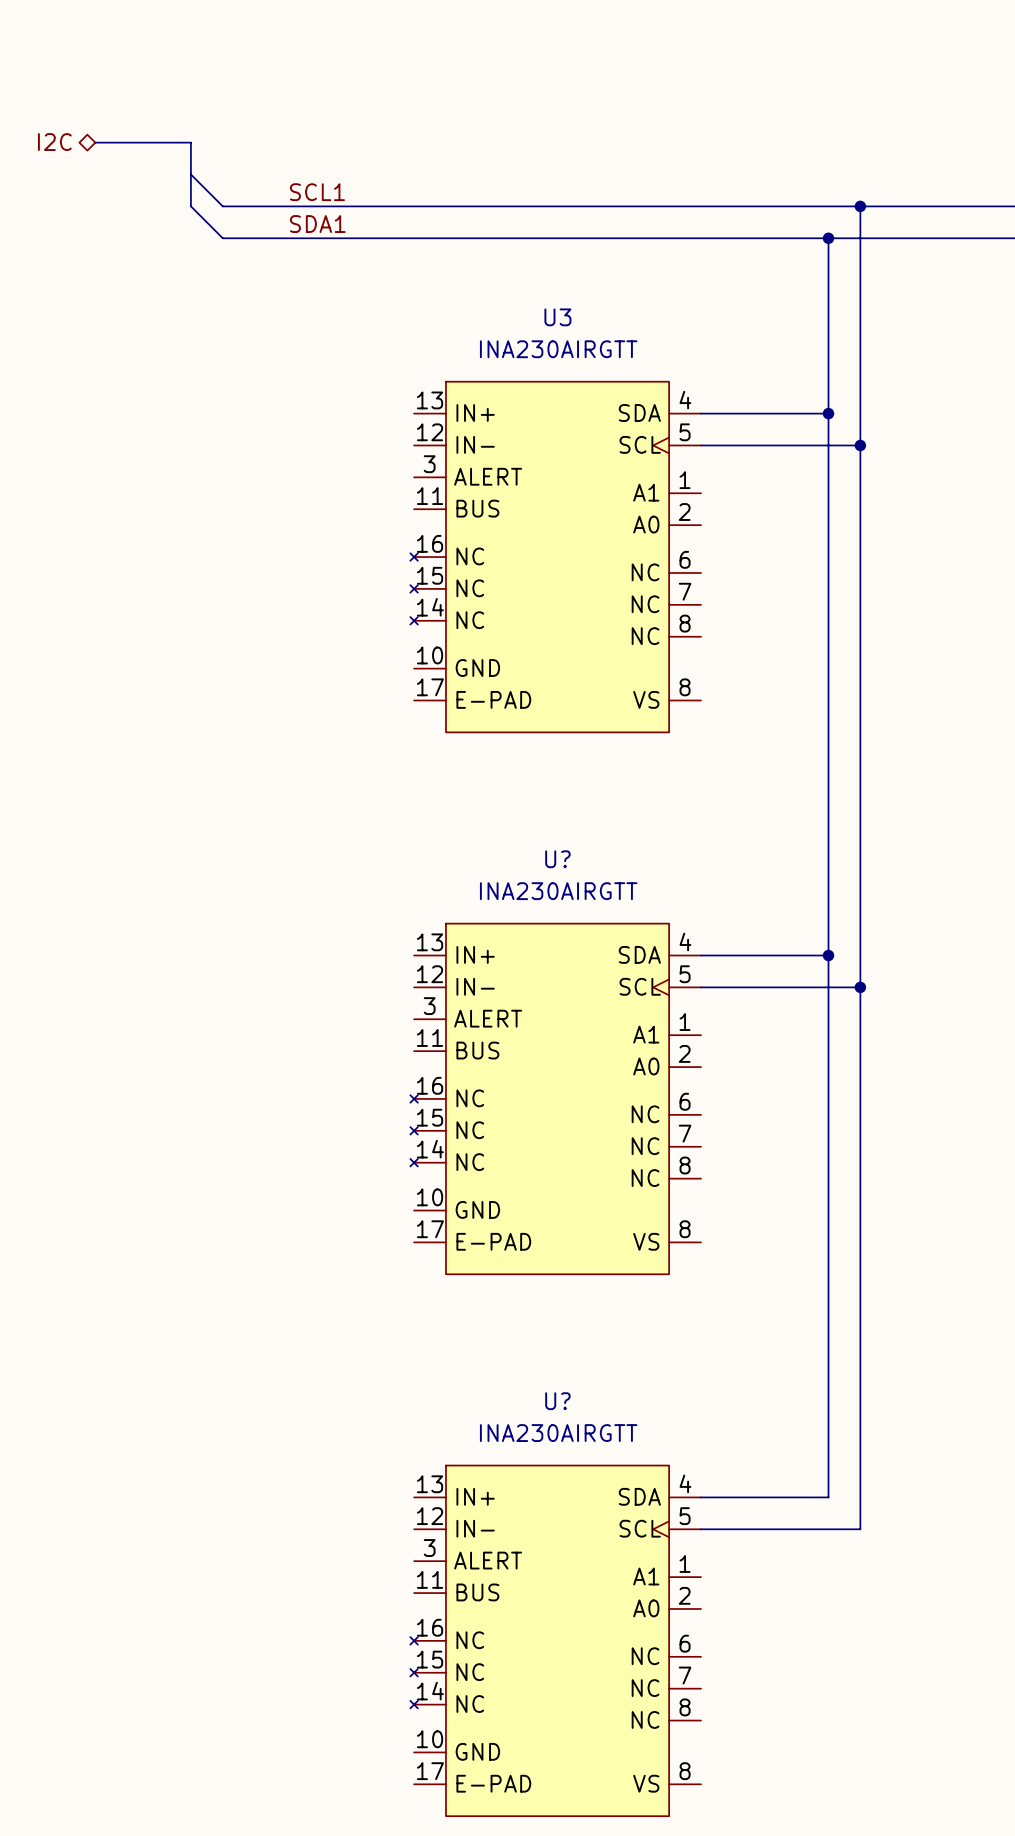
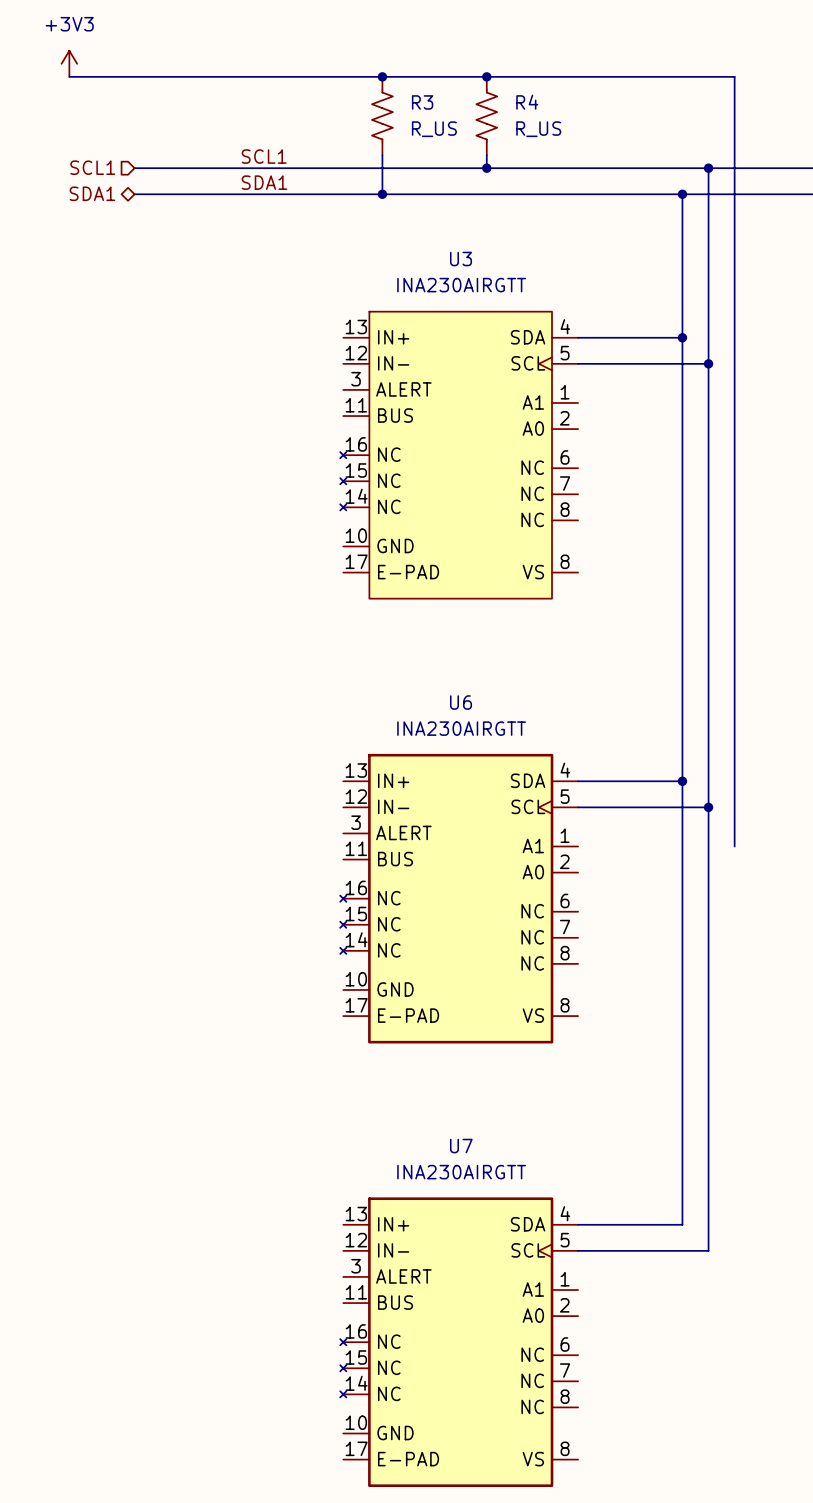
power symbol: none -> +3V3 (69, 63)
wire: none -> (69, 76) (734, 76) (734, 846)
junction: none -> (382, 76)
junction: none -> (486, 76)
hierarchical label: I2C (54, 142) -> none
bus: (95, 142) (190, 142) (190, 206) -> none
R3: none -> R_US (382, 116)
R4: none -> R_US (486, 116)
wire: (190, 174) (222, 206) -> (134, 168) (186, 168)
wire: none -> (382, 155) (382, 194)
wire: none -> (486, 155) (486, 168)
hierarchical label: none -> SCL1 (92, 167)
wire: (190, 206) (222, 238) -> (134, 194) (186, 194)
junction: none -> (486, 168)
hierarchical label: none -> SDA1 (92, 193)
junction: none -> (382, 194)
U?: INA230AIRGTT (555, 1098) -> none
U6: none -> INA230AIRGTT (459, 898)
U?: INA230AIRGTT (555, 1640) -> none
U7: none -> INA230AIRGTT (459, 1342)

